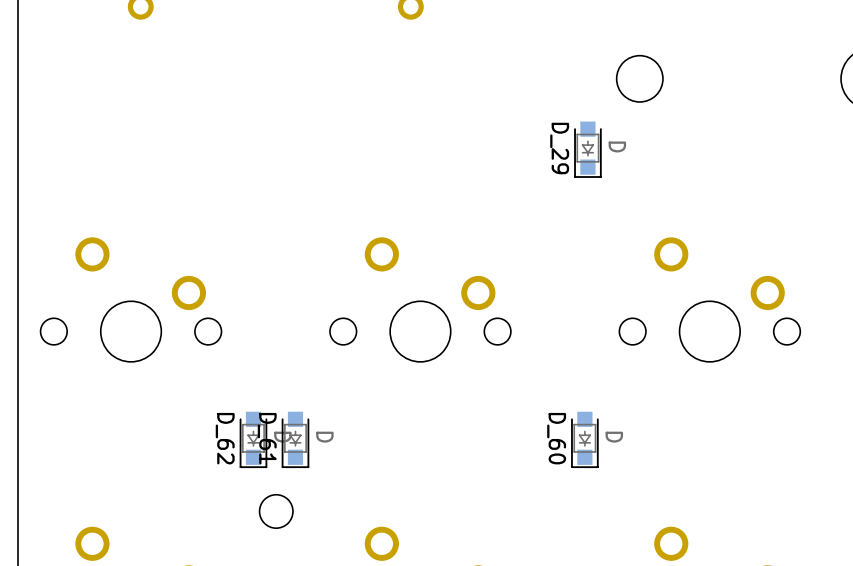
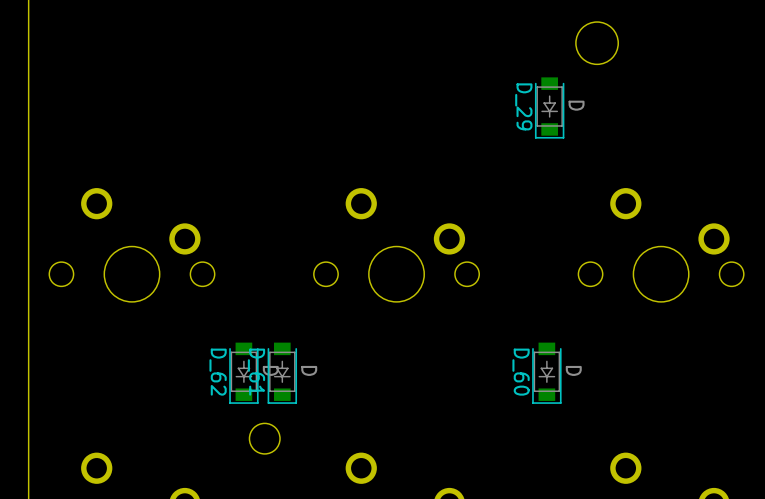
D_29 footprint: [574, 121, 602, 178] -> [534, 77, 565, 139]
D_62 footprint: [239, 411, 268, 469] -> [229, 342, 259, 404]
D_61 footprint: [281, 411, 310, 469] -> [267, 342, 298, 404]
D_60 footprint: [571, 411, 599, 469] -> [532, 342, 562, 404]

